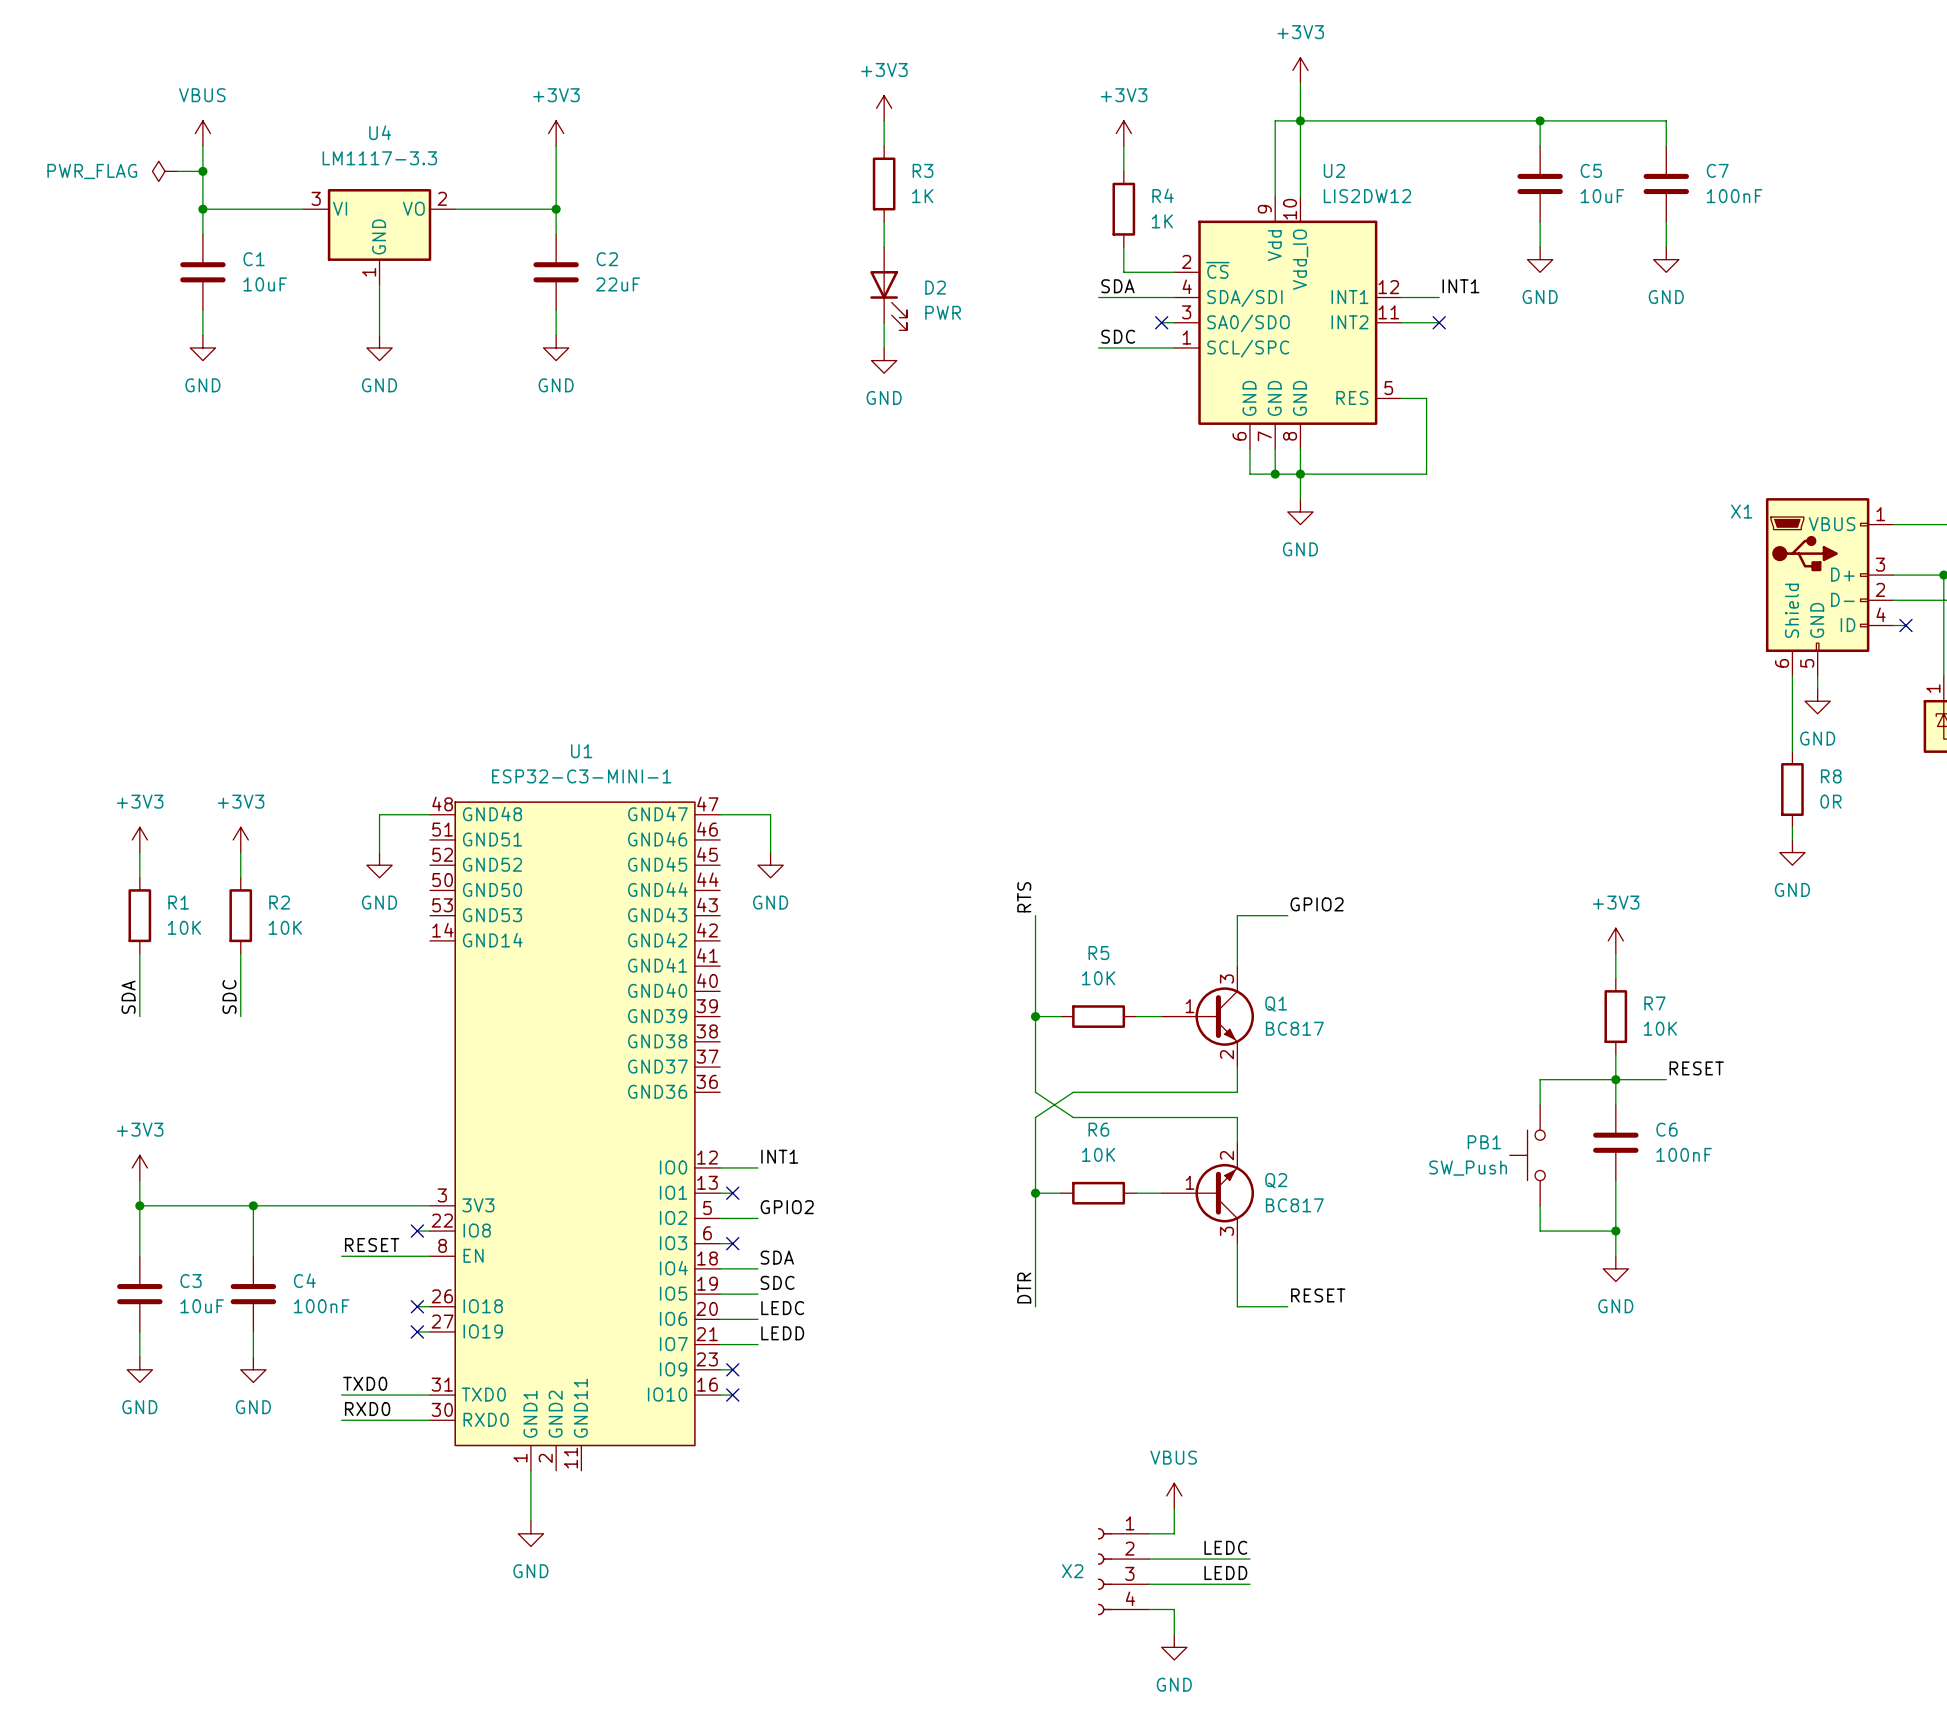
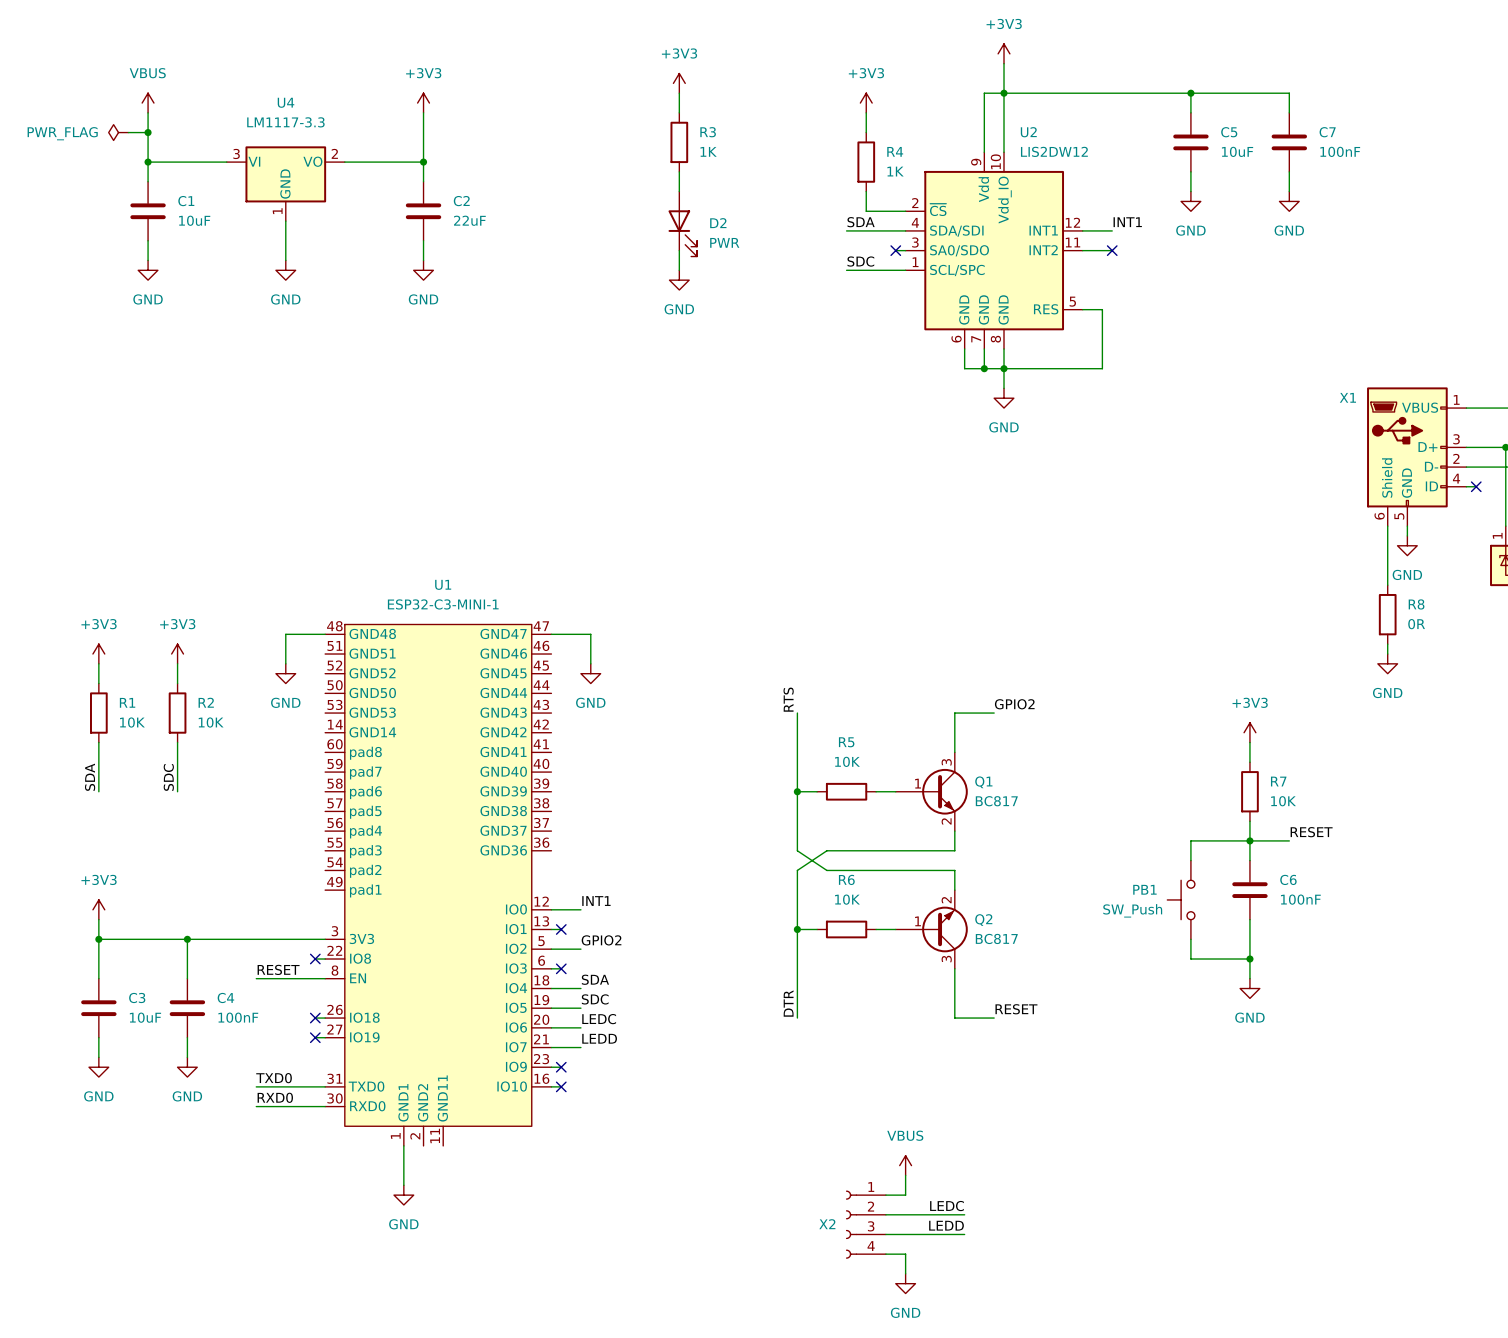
U1 symbol: [429, 801, 721, 1471] -> [325, 623, 552, 1146]

